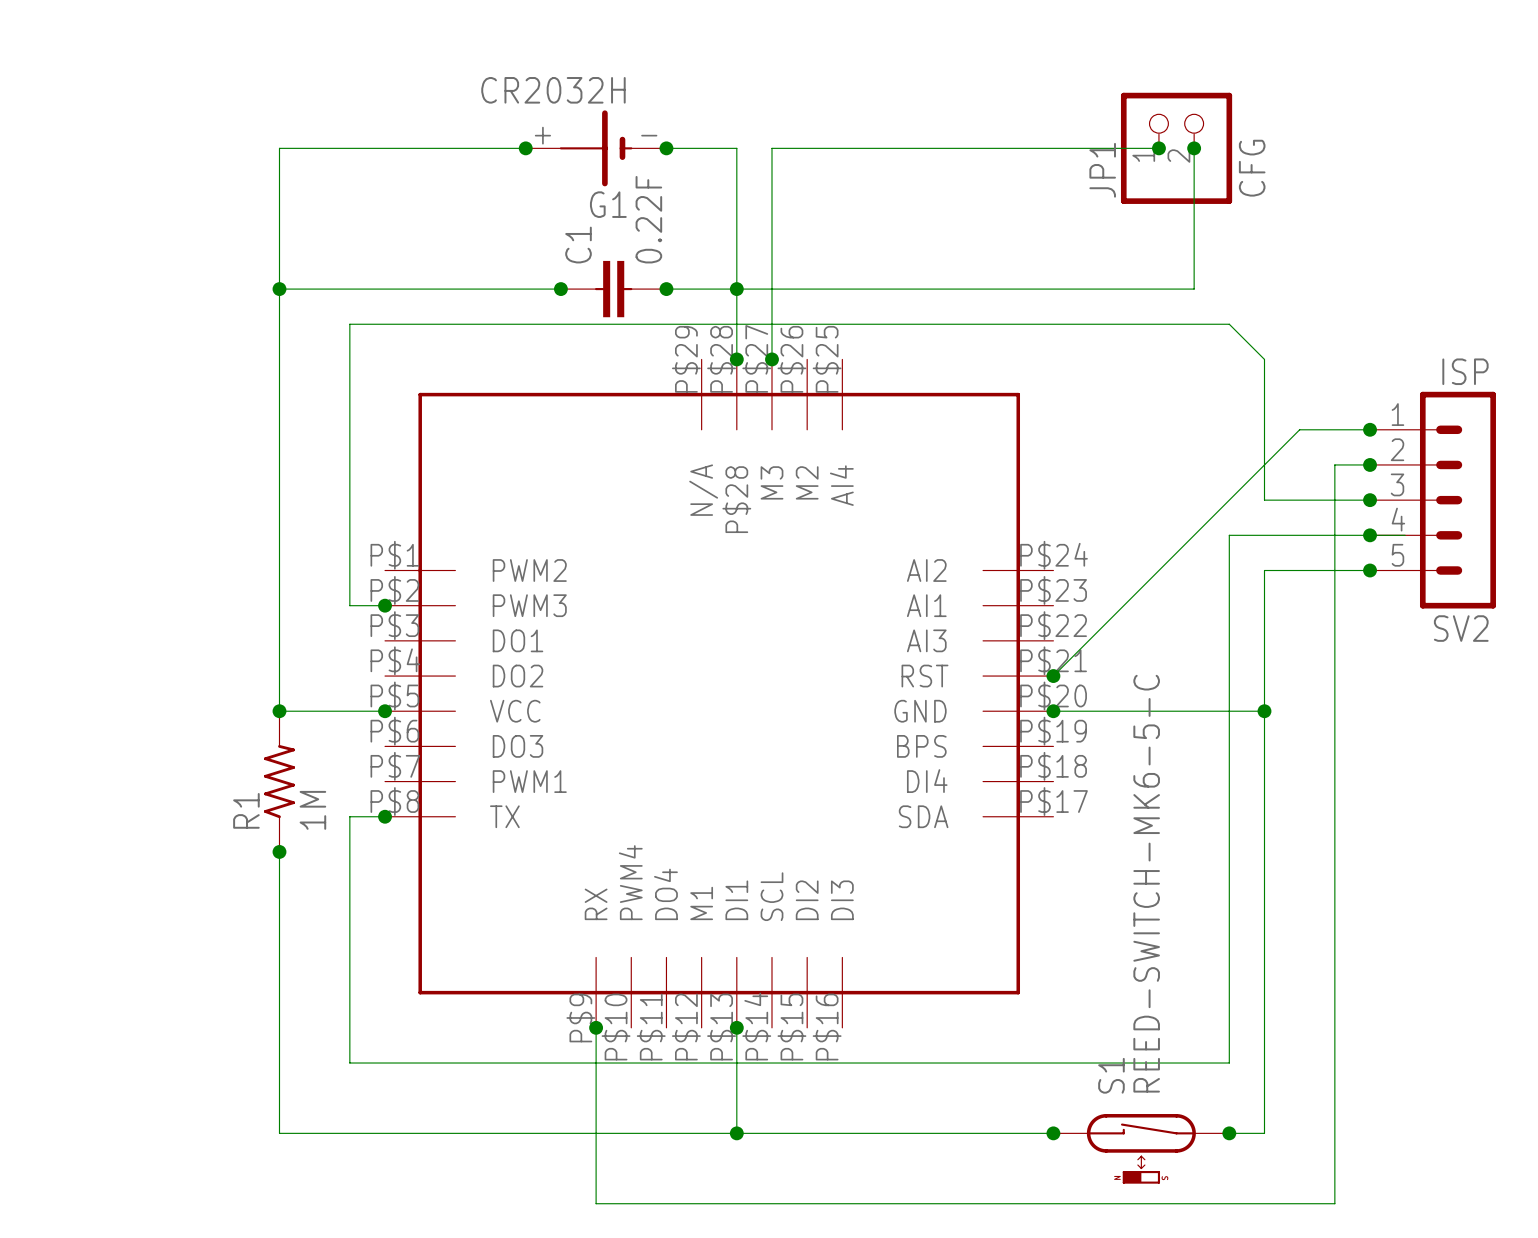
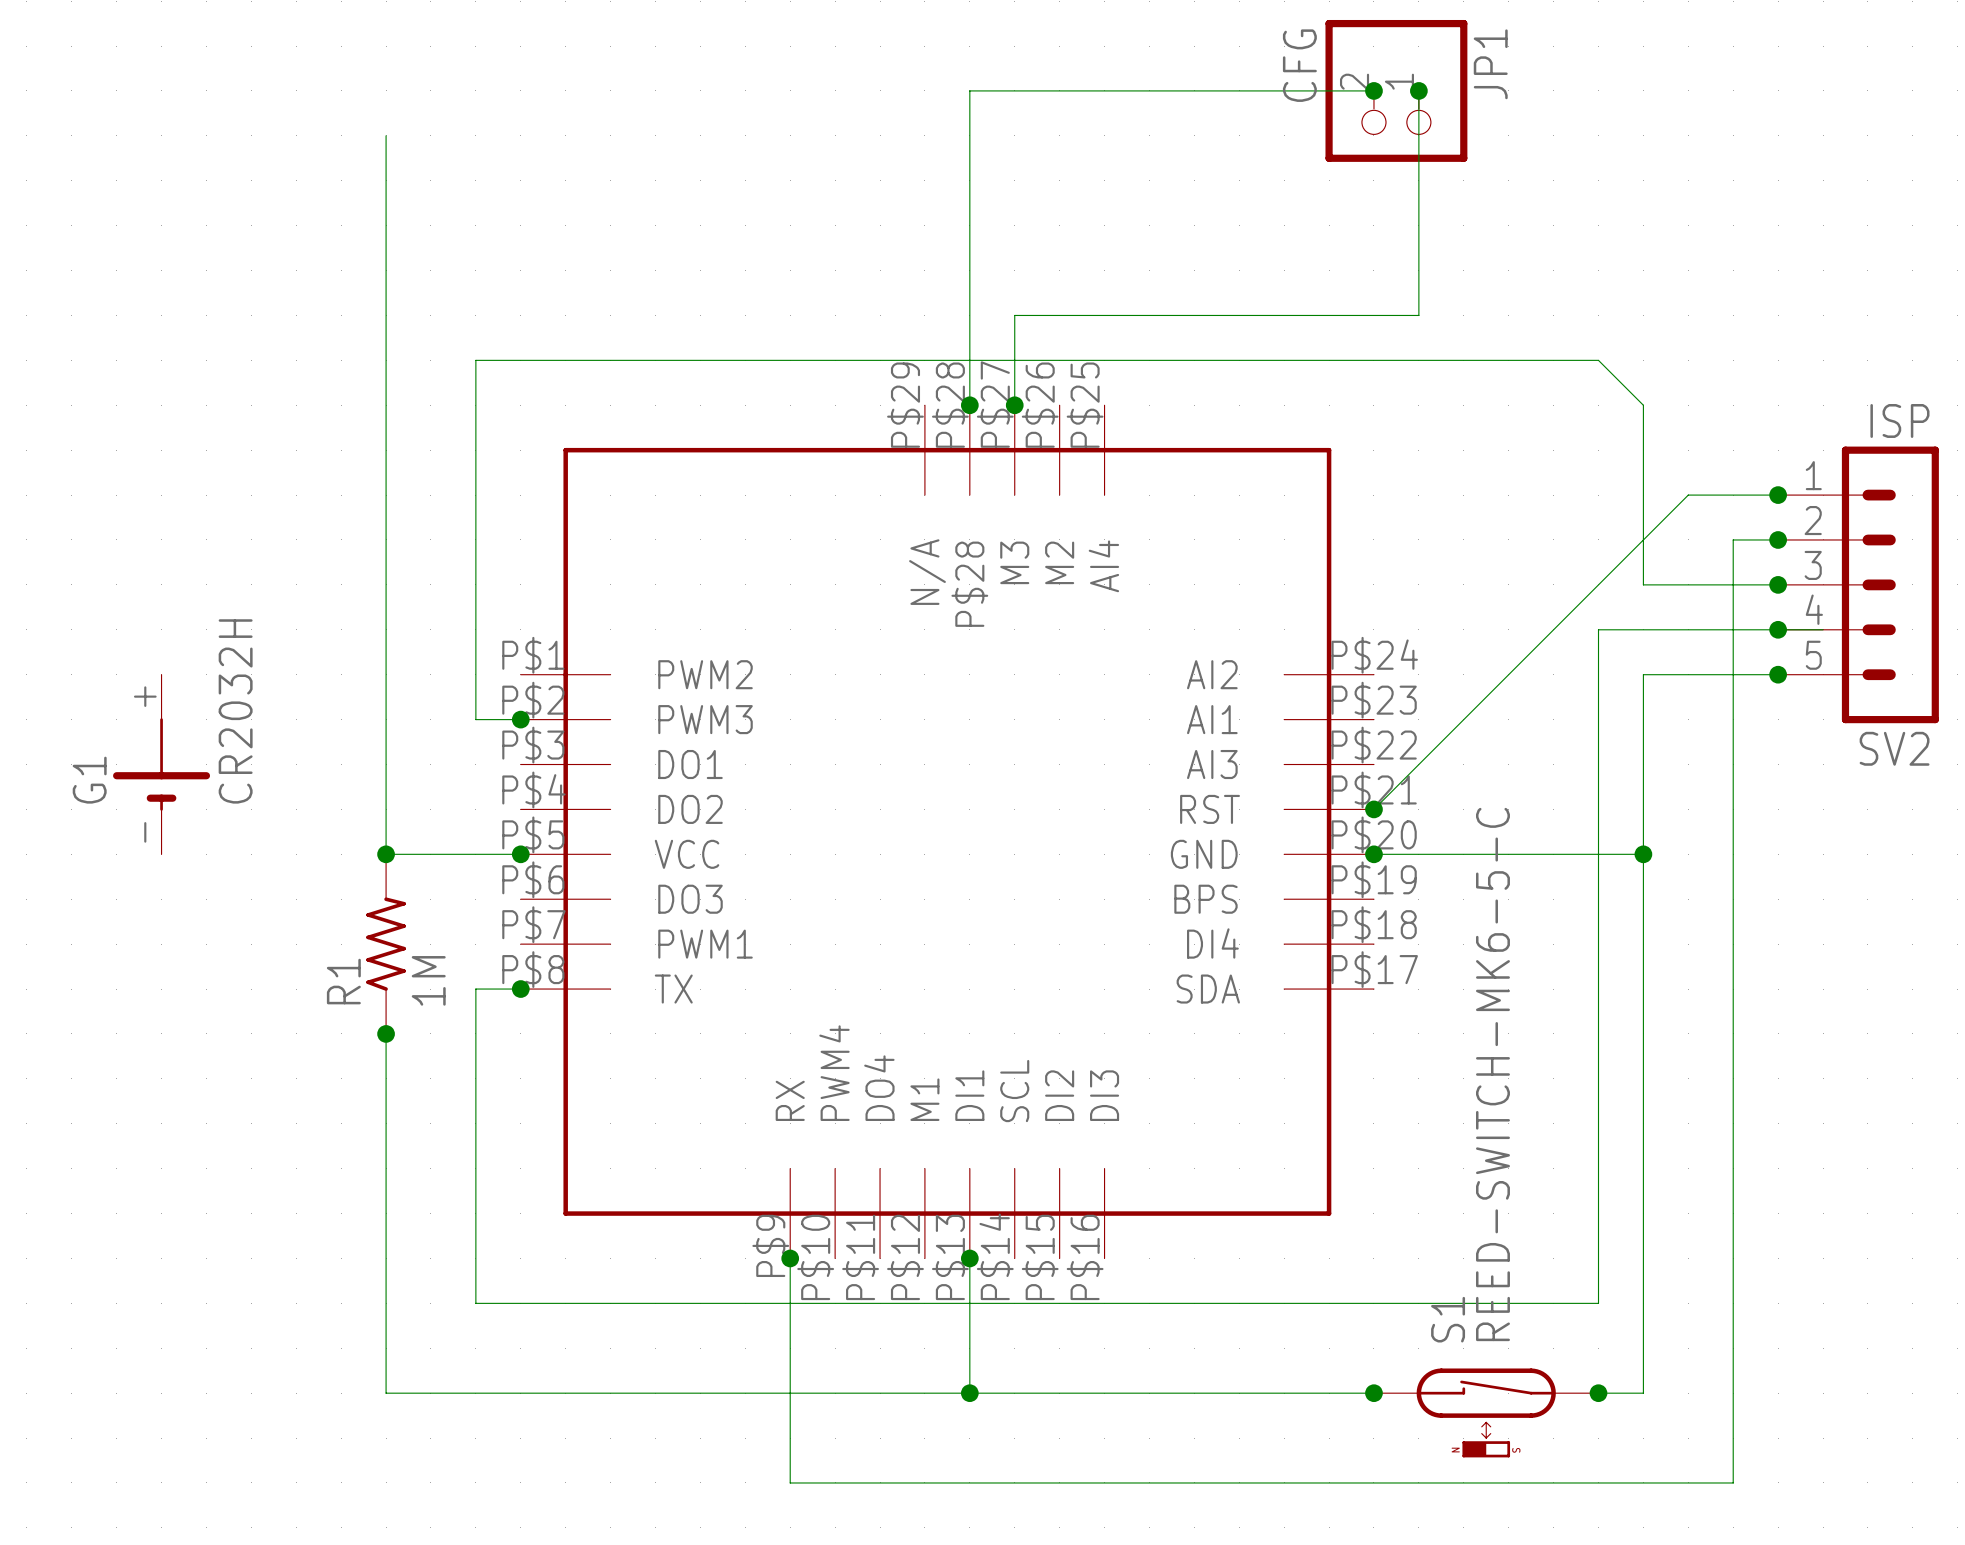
junction: none -> (1373, 90)
junction: none -> (1418, 90)
wire: (279, 148) (525, 148) -> none
junction: (525, 148) -> none
G1 rotation: 0° (596, 148) -> 90° clockwise (161, 764)
G1 position: (596, 148) -> (161, 764)
wire: (666, 148) (736, 148) -> (1373, 90) (969, 90) (969, 135)
junction: (666, 148) -> none
wire: (1158, 148) (771, 148) (771, 289) (666, 289) -> none
junction: (1158, 148) -> none
JP1 rotation: 0° (1176, 148) -> 180° (1396, 90)
JP1 position: (1176, 148) -> (1396, 90)
wire: (1194, 148) (1194, 289) (1088, 289) -> (1418, 90) (1418, 315)
junction: (1194, 148) -> none
wire: (279, 289) (560, 289) -> none
junction: (279, 289) -> none
junction: (560, 289) -> none
C1: 0.22F (613, 289) -> none
junction: (666, 289) -> none
junction: (736, 289) -> none

